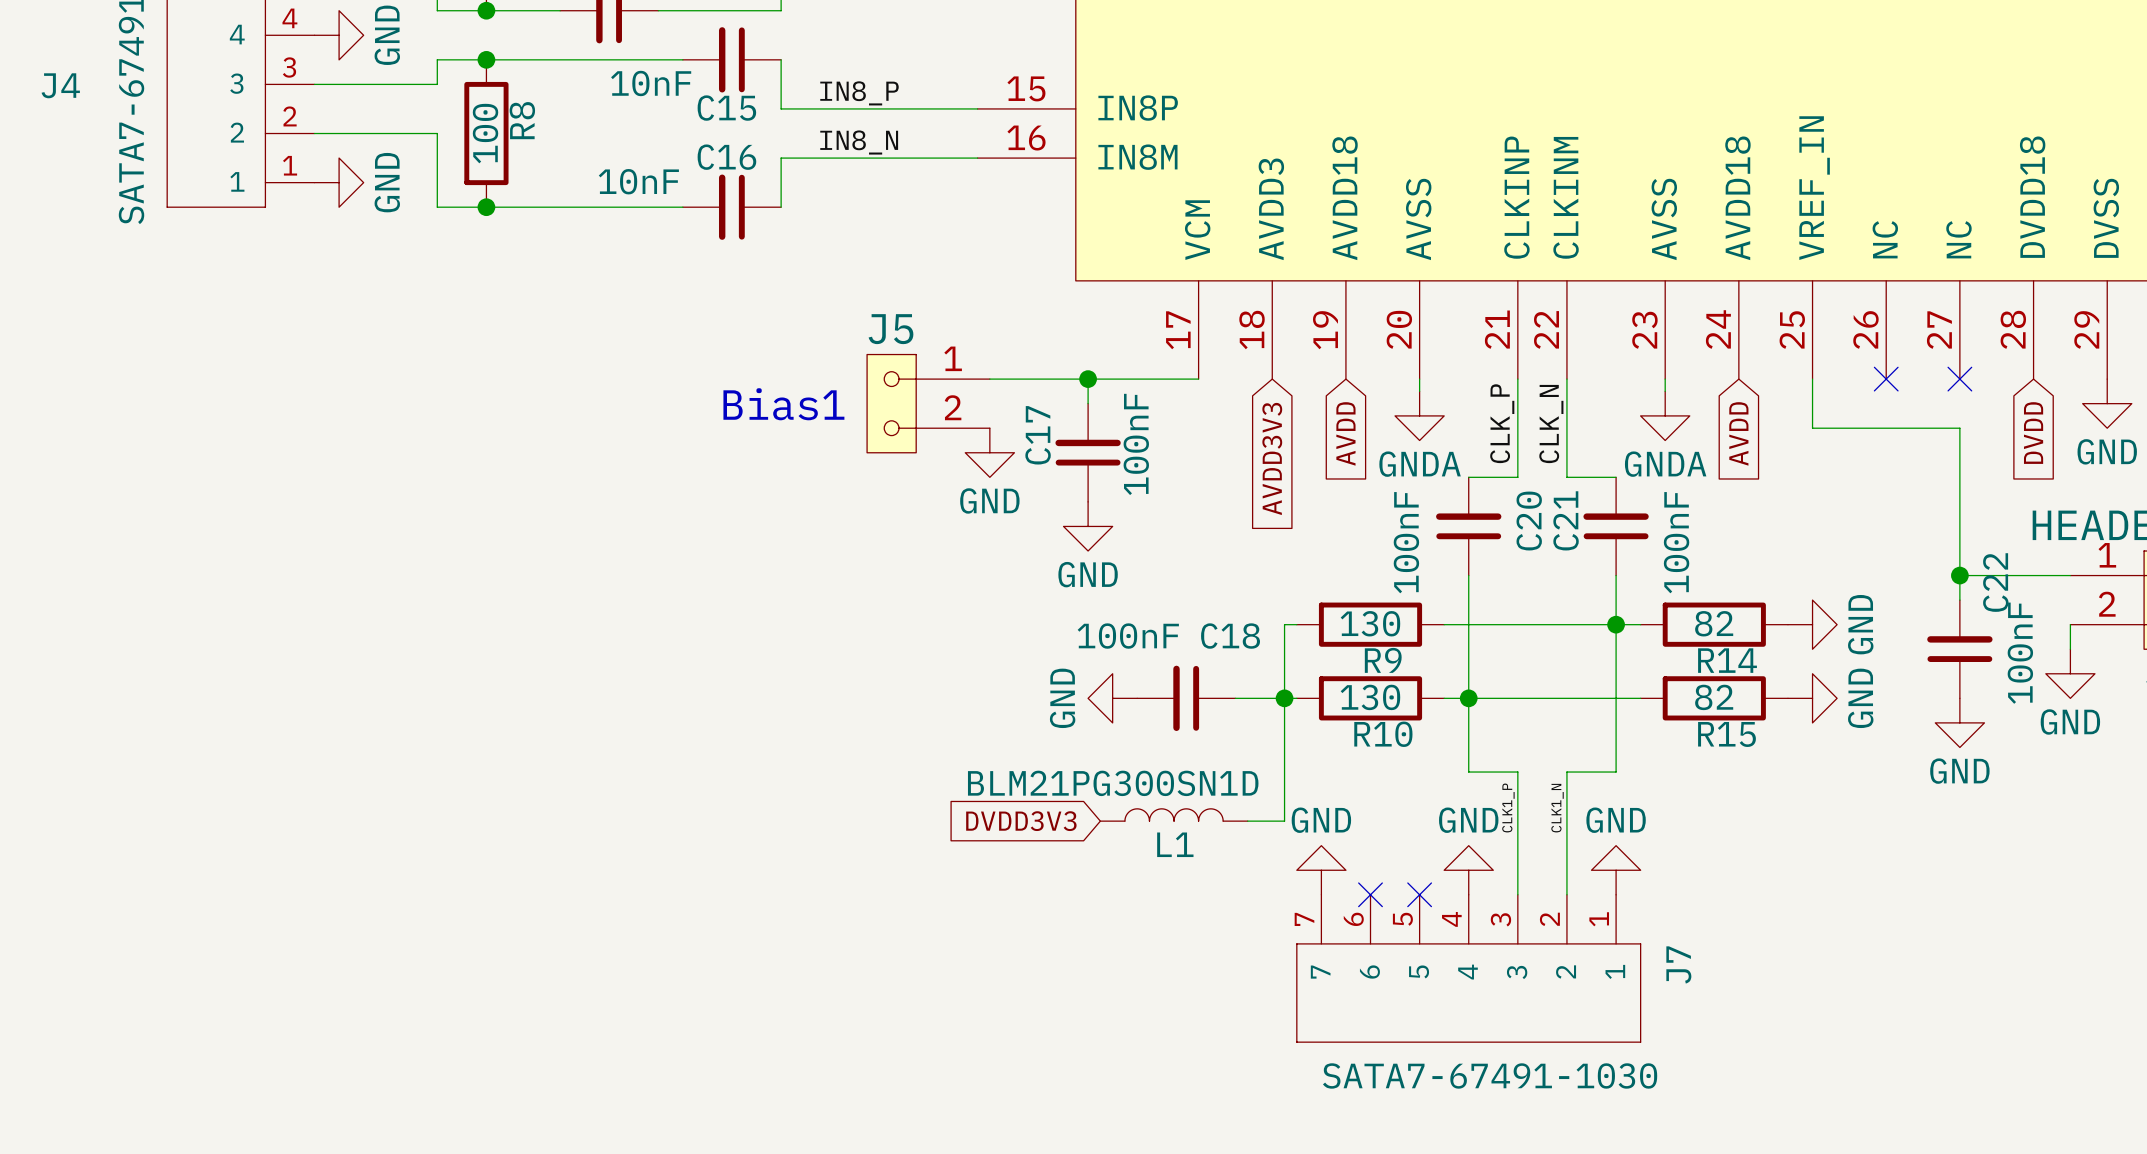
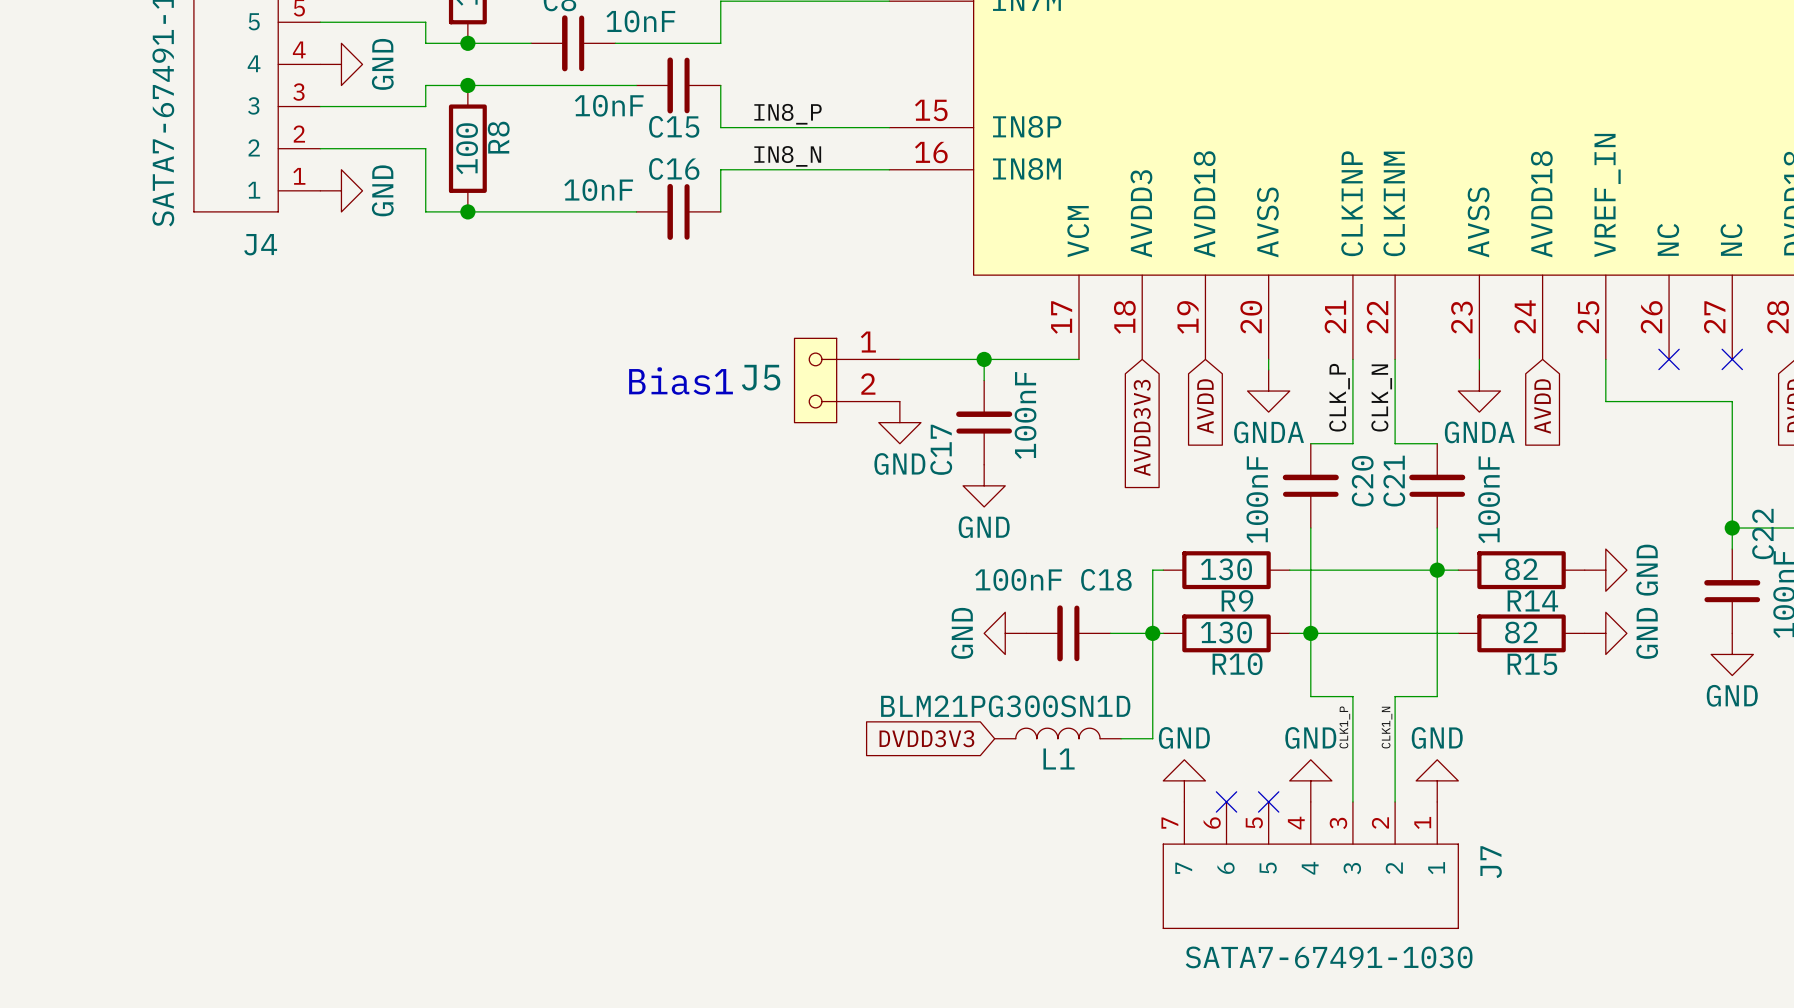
J4 name position: J4 (60, 85) -> J4 (260, 244)
J5 name position: J5 (891, 329) -> J5 (761, 377)
text position: Bias1 (783, 404) -> Bias1 (681, 380)
C17 name position: C17 (1038, 435) -> C17 (941, 449)

